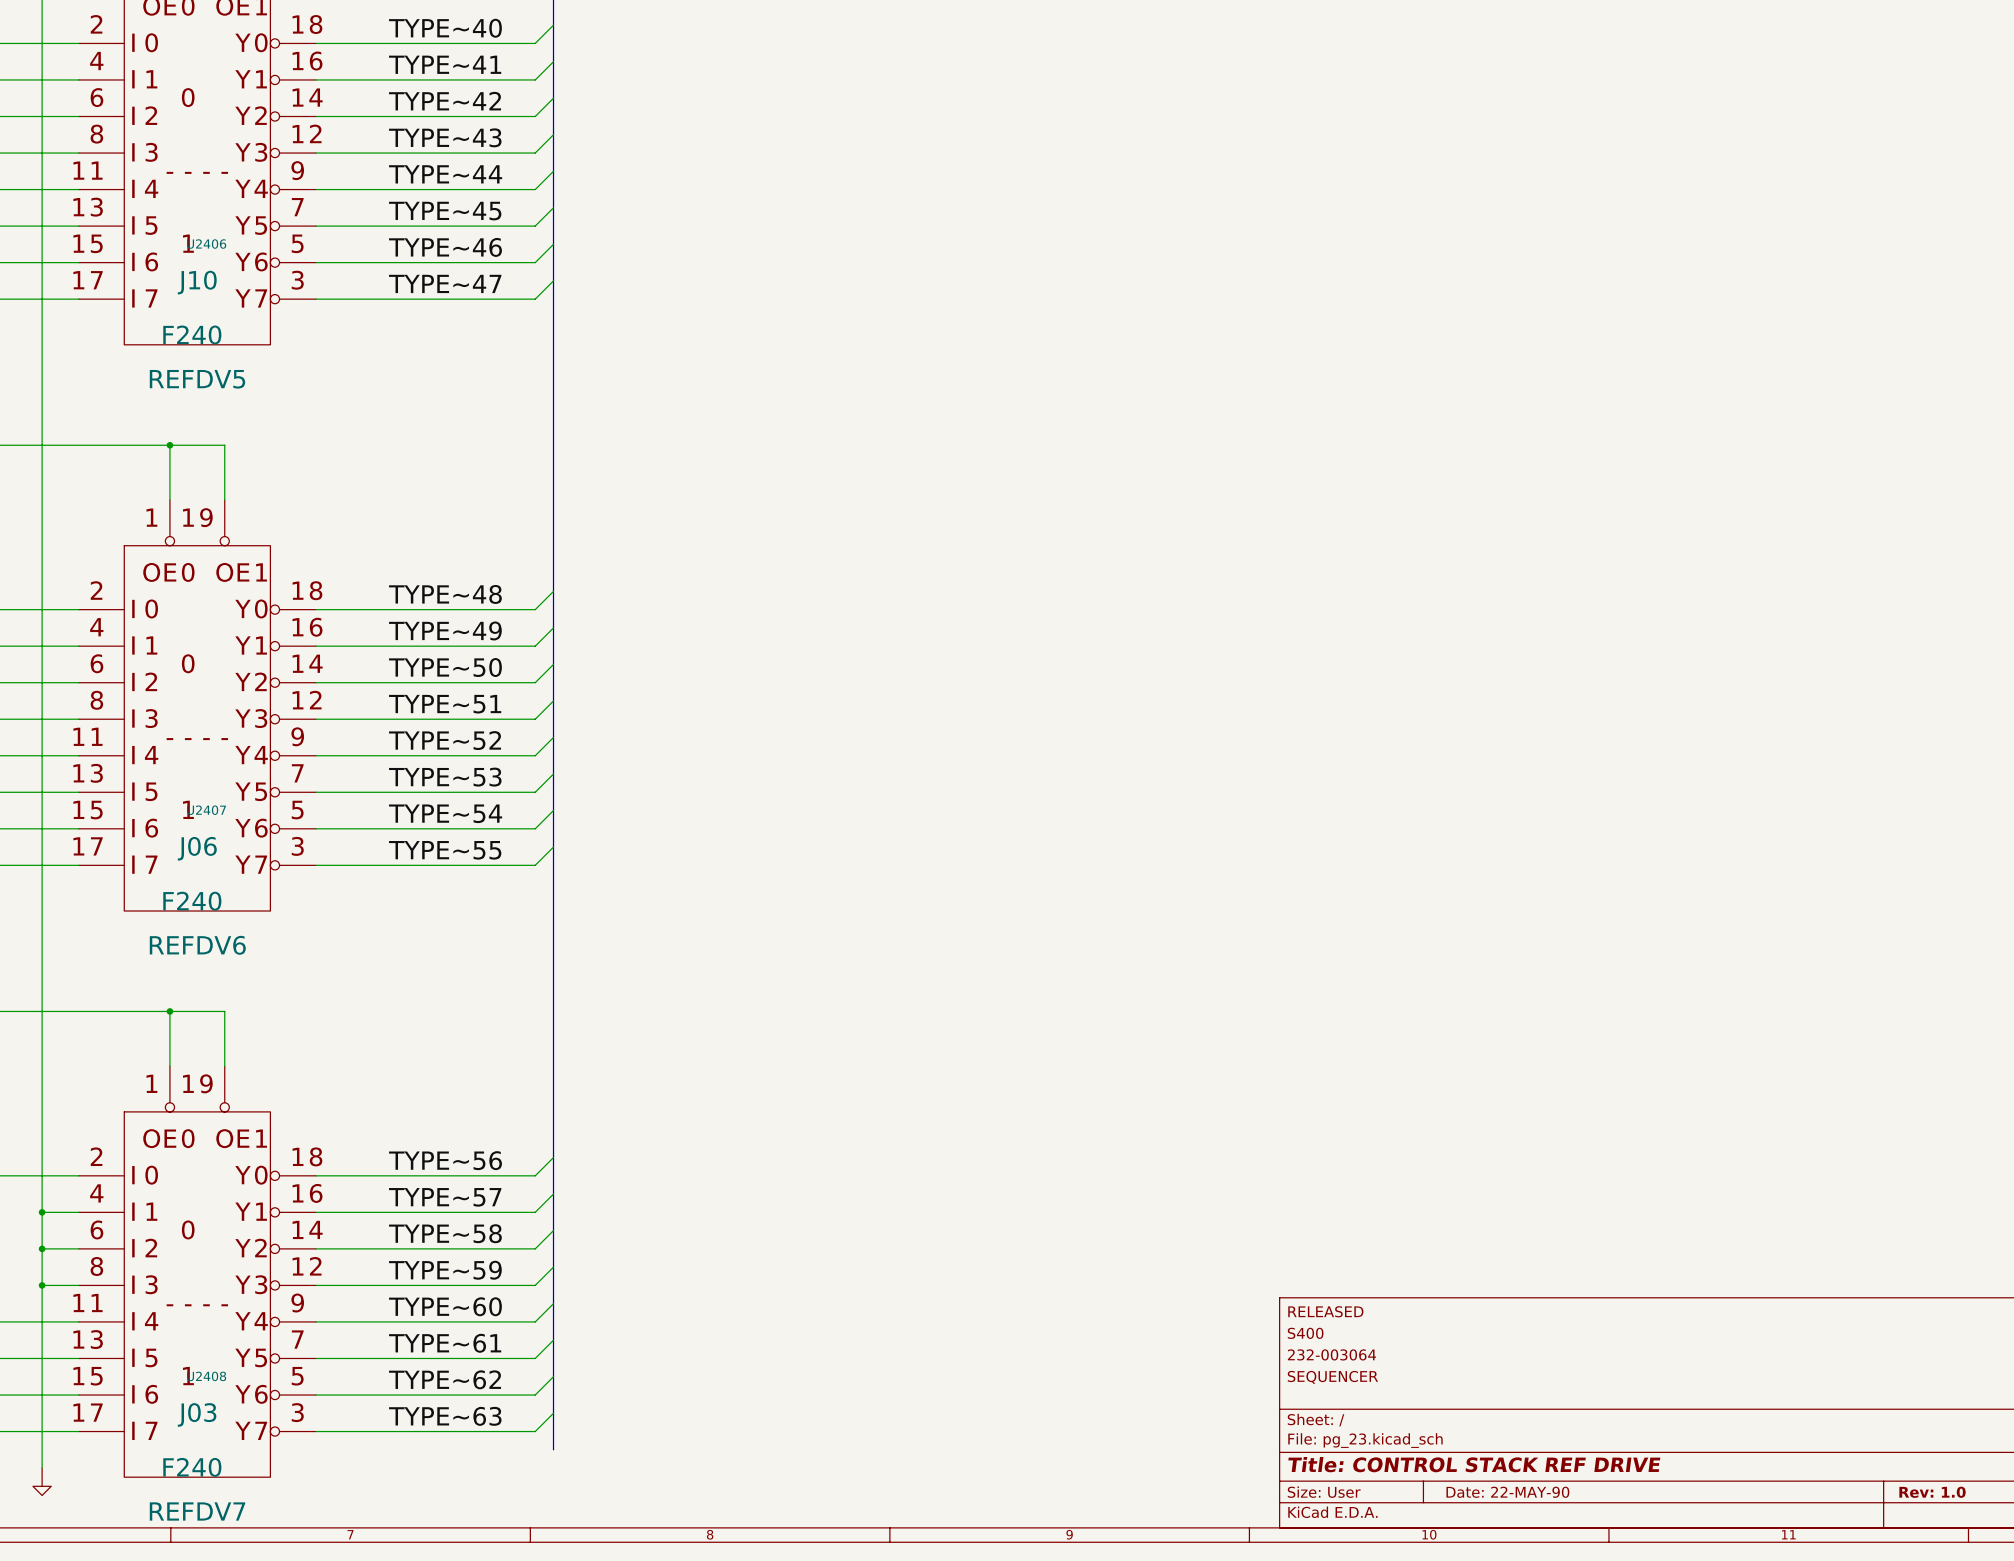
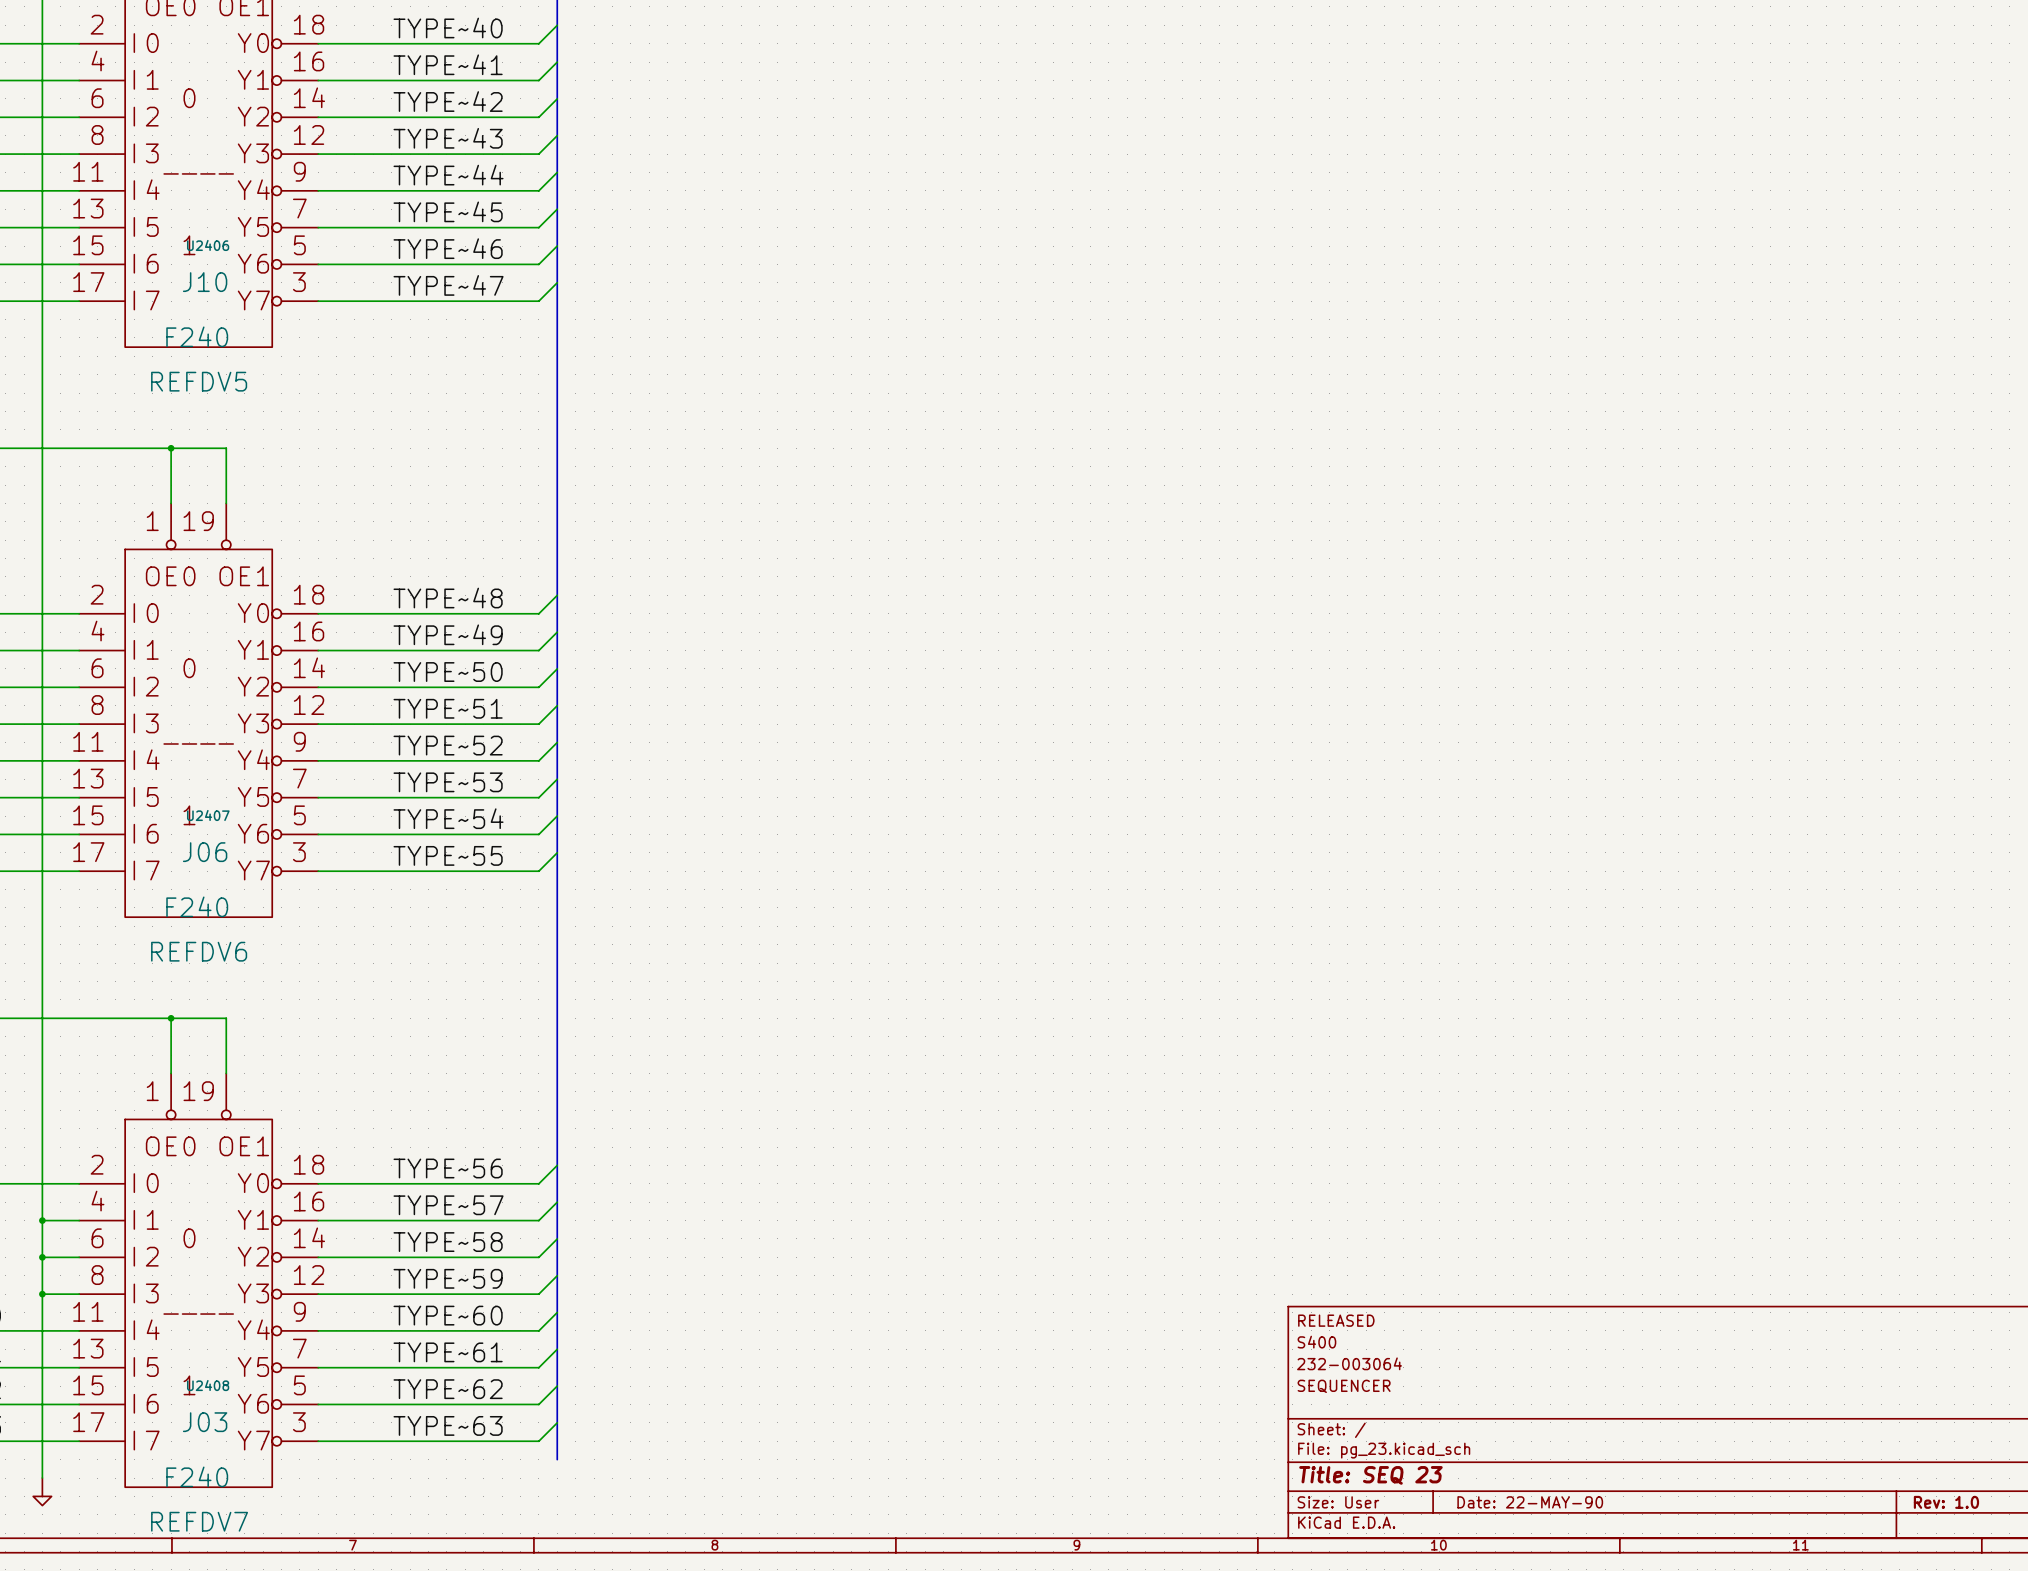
title block: Title: CONTROL STACK REF DRIVE (1474, 1464) -> Title: SEQ 23 (1370, 1475)

